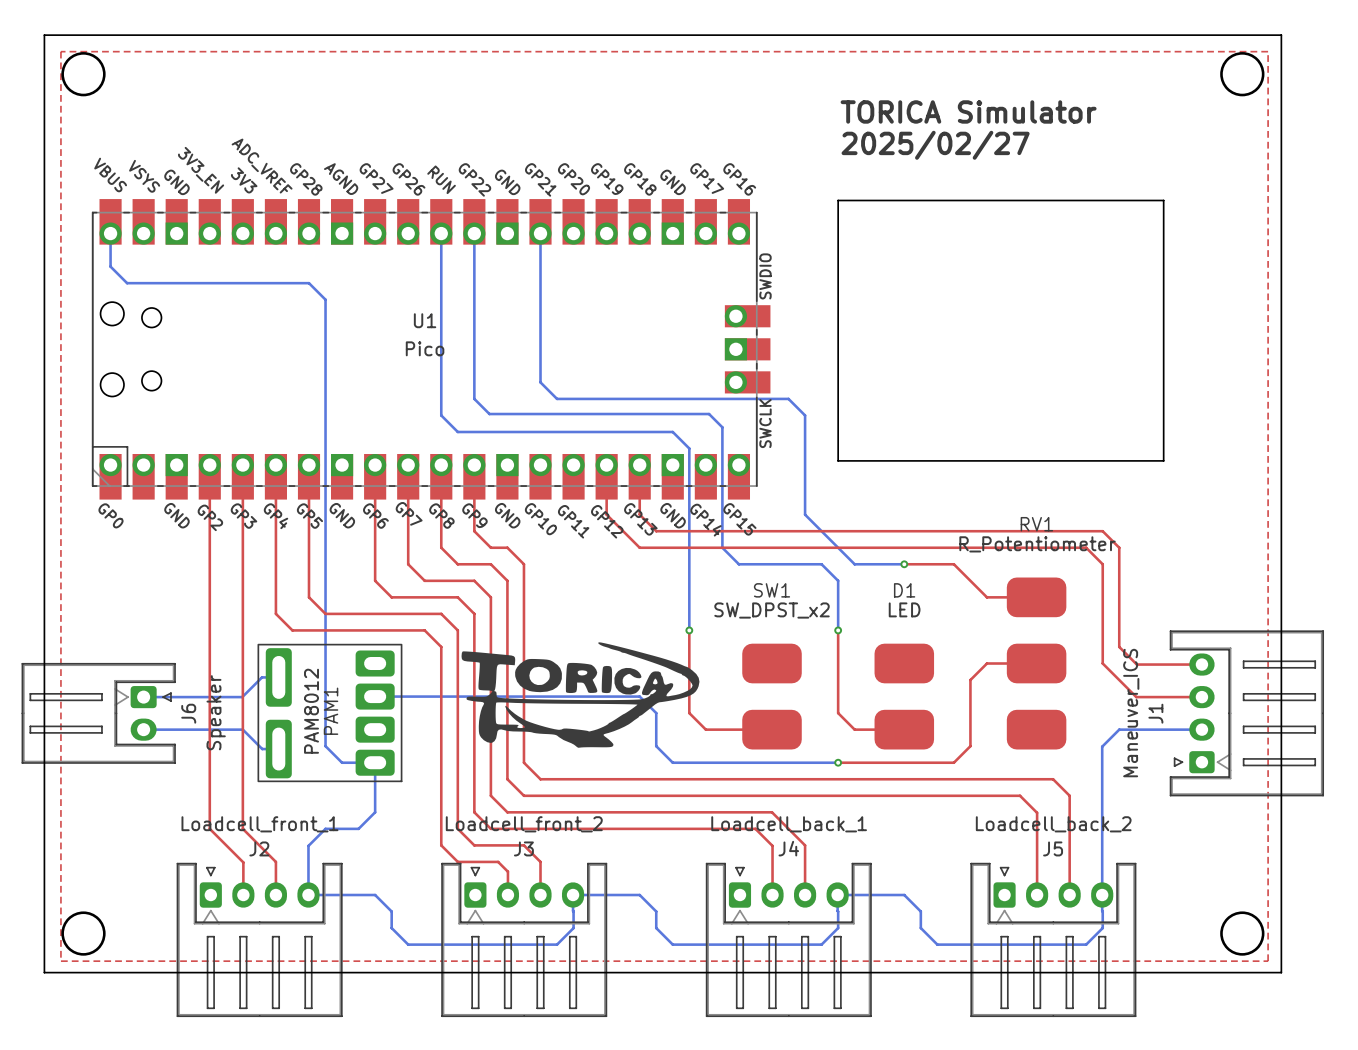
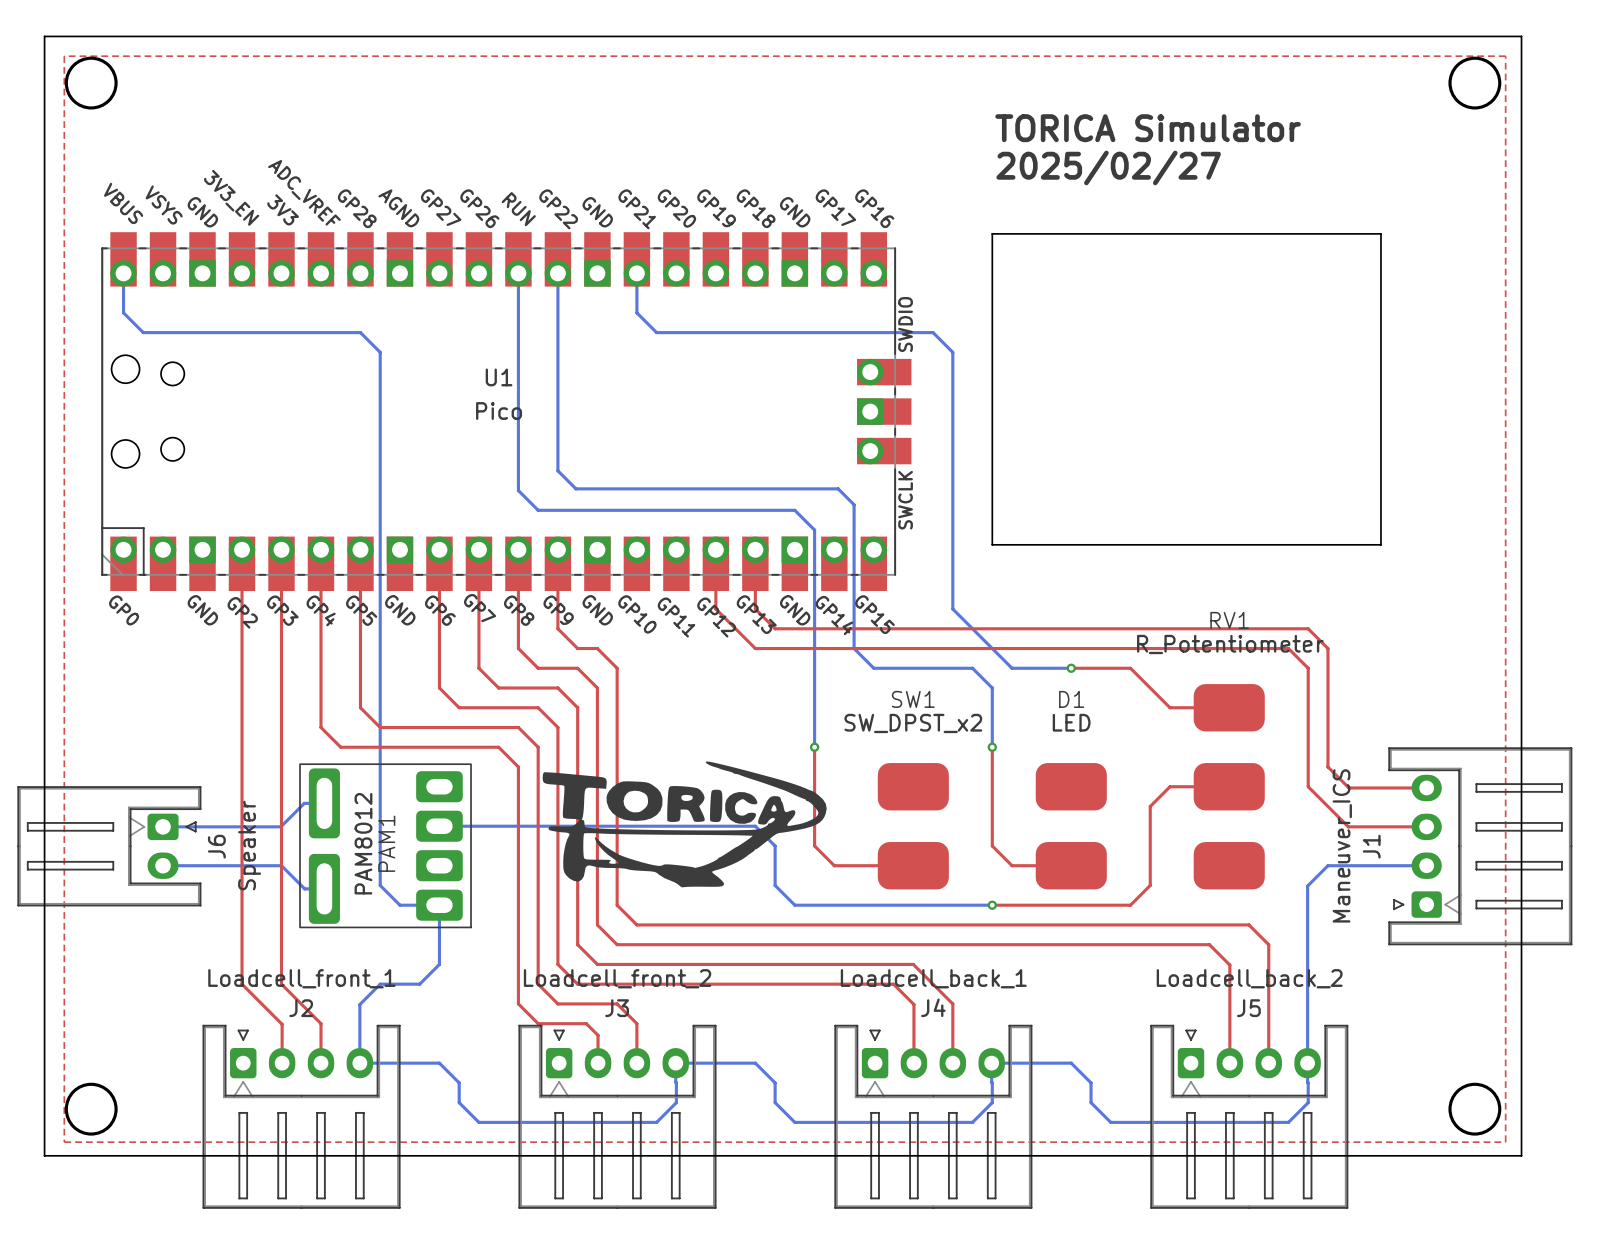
bottom track: (540, 266) (540, 382) (557, 398) (788, 398) (805, 415) -> (636, 312) (656, 332) (933, 332) (952, 352) (952, 490)

